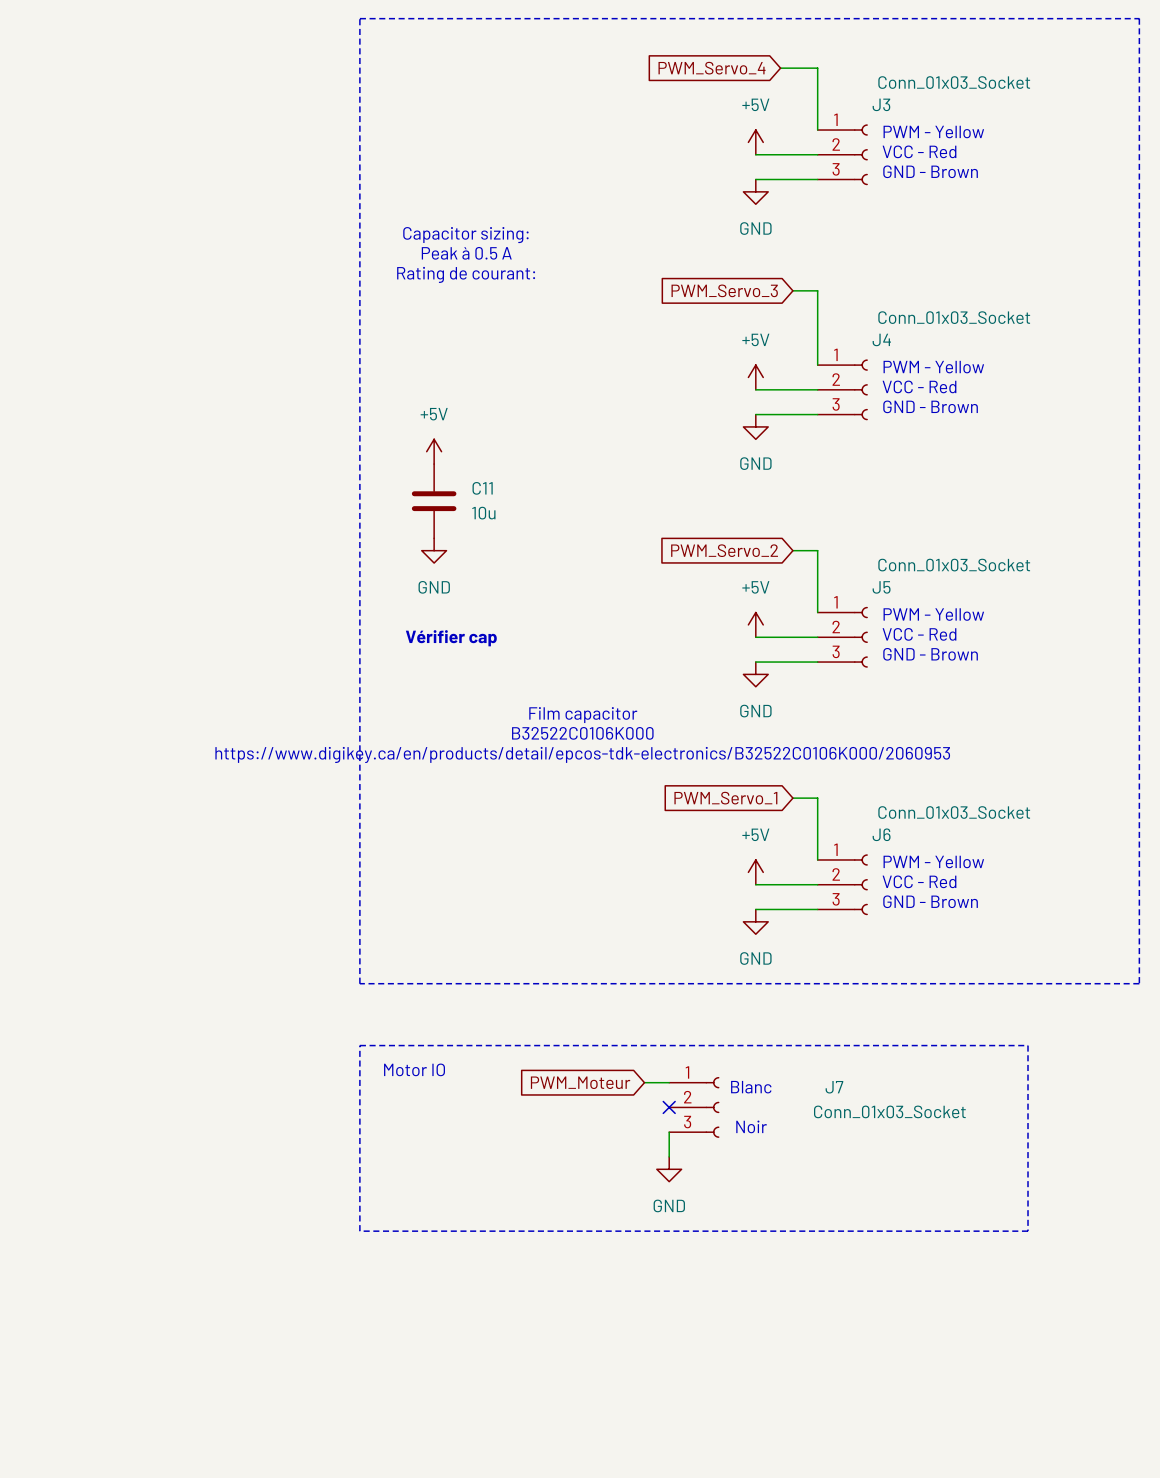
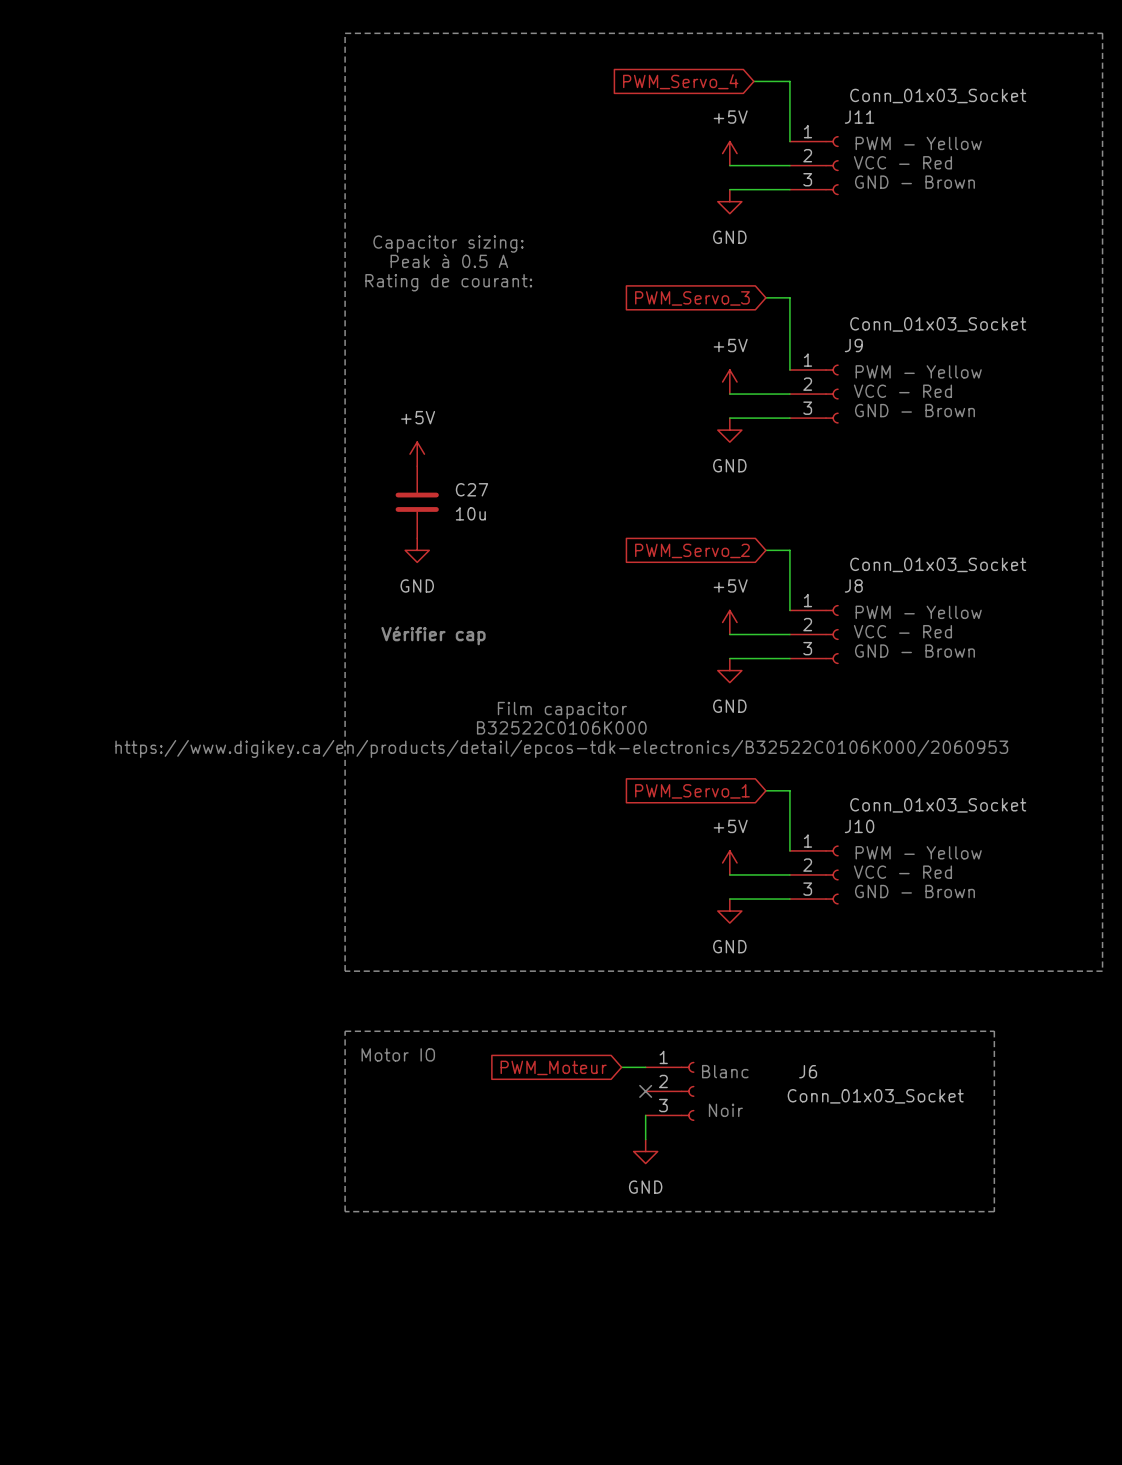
J3 name: J3 (881, 104) -> J11 (859, 117)
J4 name: J4 (881, 339) -> J9 (853, 345)
C11 name: C11 (482, 488) -> C27 (471, 489)
J5 name: J5 (881, 587) -> J8 (853, 585)
J6 name: J6 (881, 834) -> J10 (859, 826)
J7 name: J7 (834, 1087) -> J6 (808, 1071)

